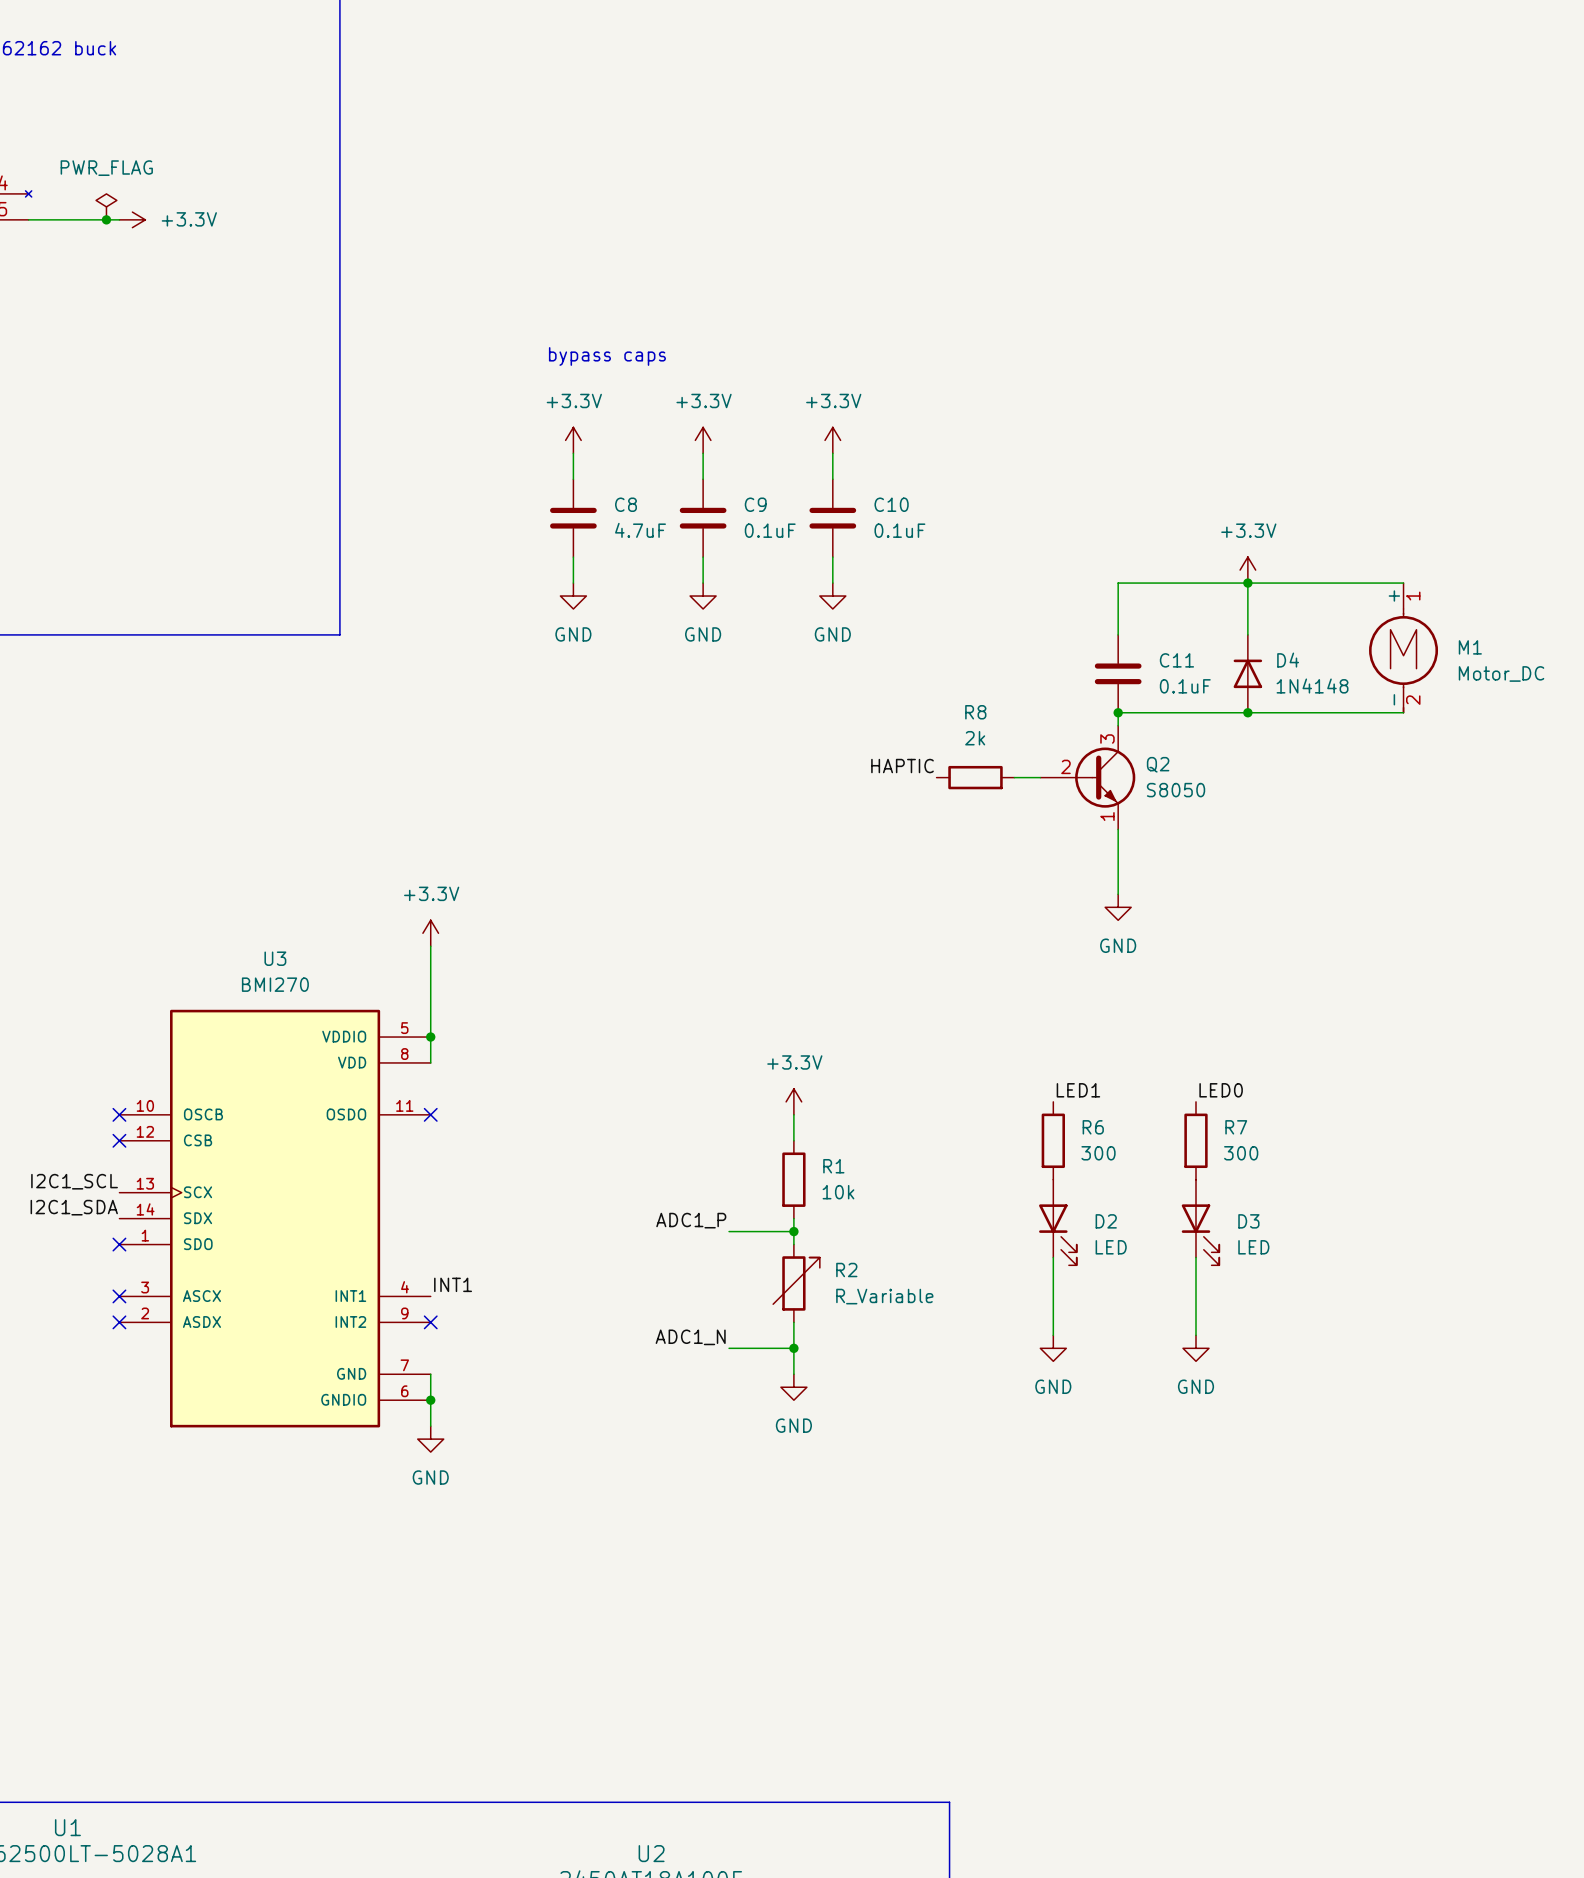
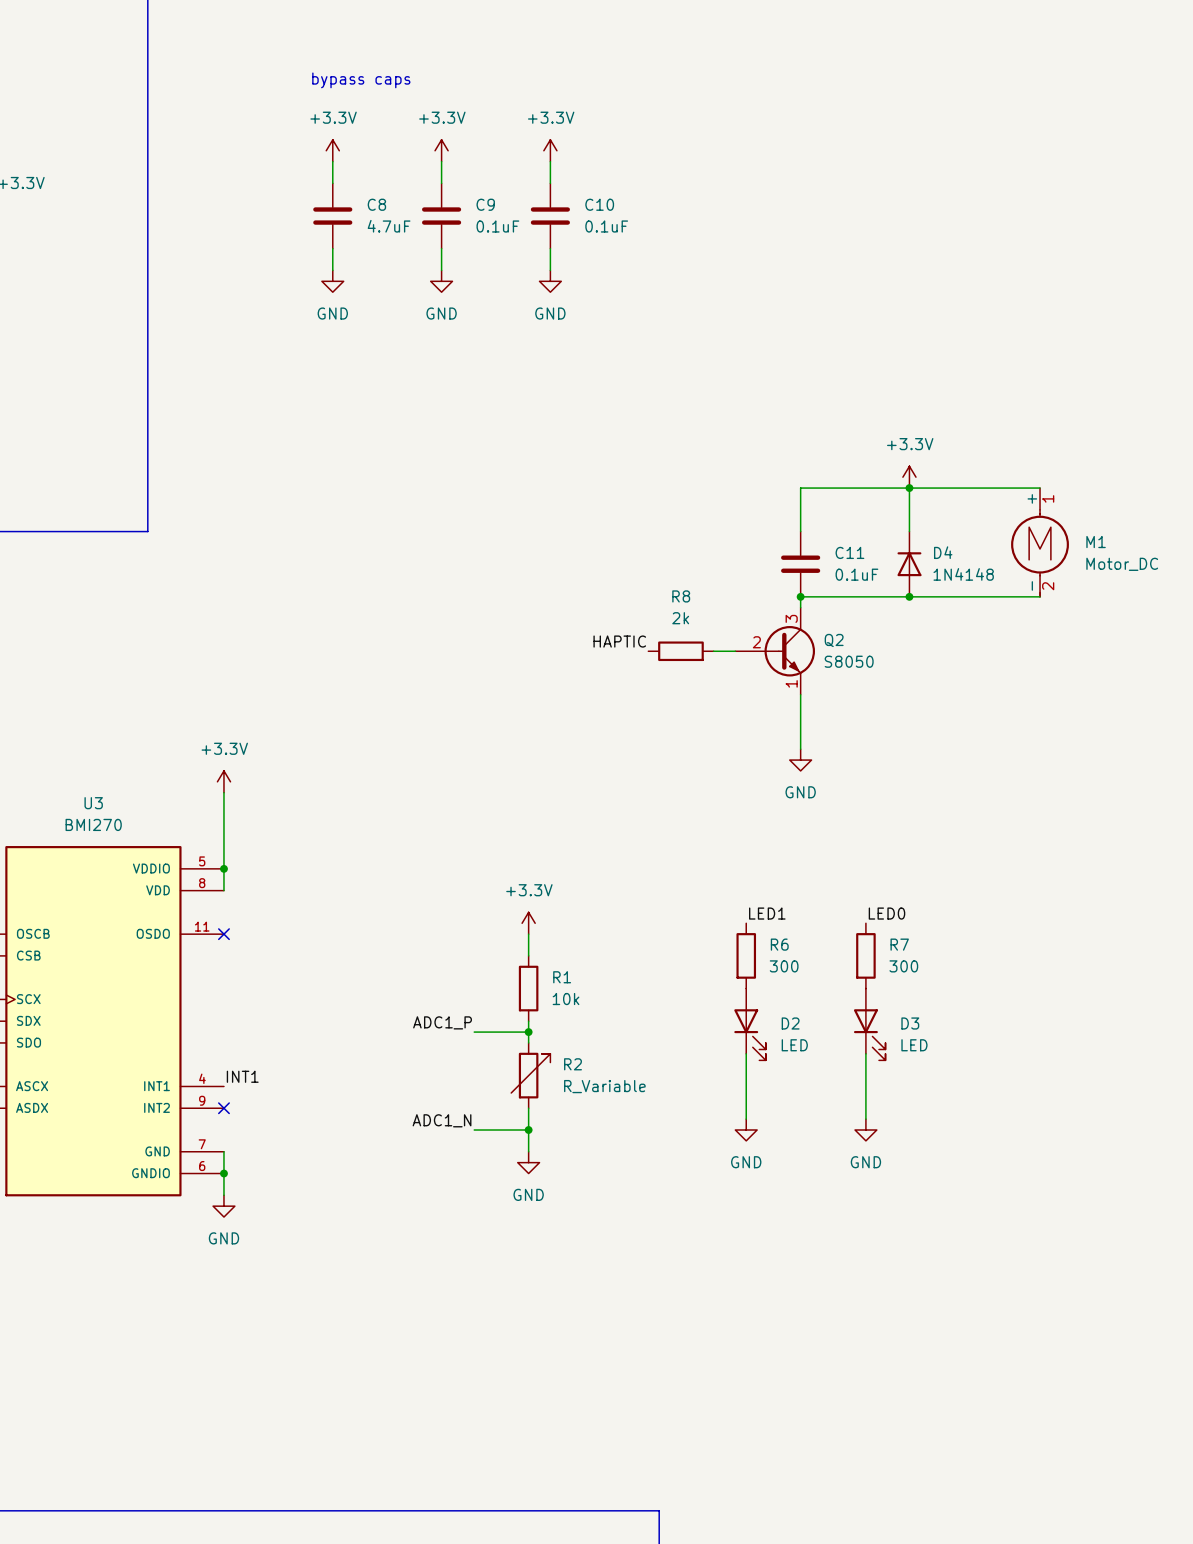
text: none -> bypass caps (361, 80)
power symbol: none -> +3.3V (332, 150)
power symbol: none -> +3.3V (441, 150)
power symbol: none -> +3.3V (550, 150)
wire: none -> (332, 161) (332, 183)
wire: none -> (441, 161) (441, 183)
wire: none -> (550, 161) (550, 183)
power symbol: none -> GND (332, 281)
power symbol: none -> GND (441, 281)
power symbol: none -> GND (550, 281)
text: bypass caps (607, 356) -> none
power symbol: +3.3V (573, 440) -> none
power symbol: +3.3V (703, 440) -> none
power symbol: +3.3V (832, 440) -> none
wire: (573, 453) (573, 479) -> (332, 248) (332, 270)
wire: (703, 453) (703, 479) -> (441, 248) (441, 270)
wire: (832, 453) (832, 479) -> (550, 248) (550, 270)
C8 position: (573, 518) -> (332, 216)
C9 position: (703, 518) -> (441, 216)
C10 position: (832, 518) -> (550, 216)
wire: (573, 557) (573, 583) -> none
wire: (703, 557) (703, 583) -> none
wire: (832, 557) (832, 583) -> none
power symbol: GND (573, 596) -> none
power symbol: GND (703, 596) -> none
power symbol: GND (832, 596) -> none

